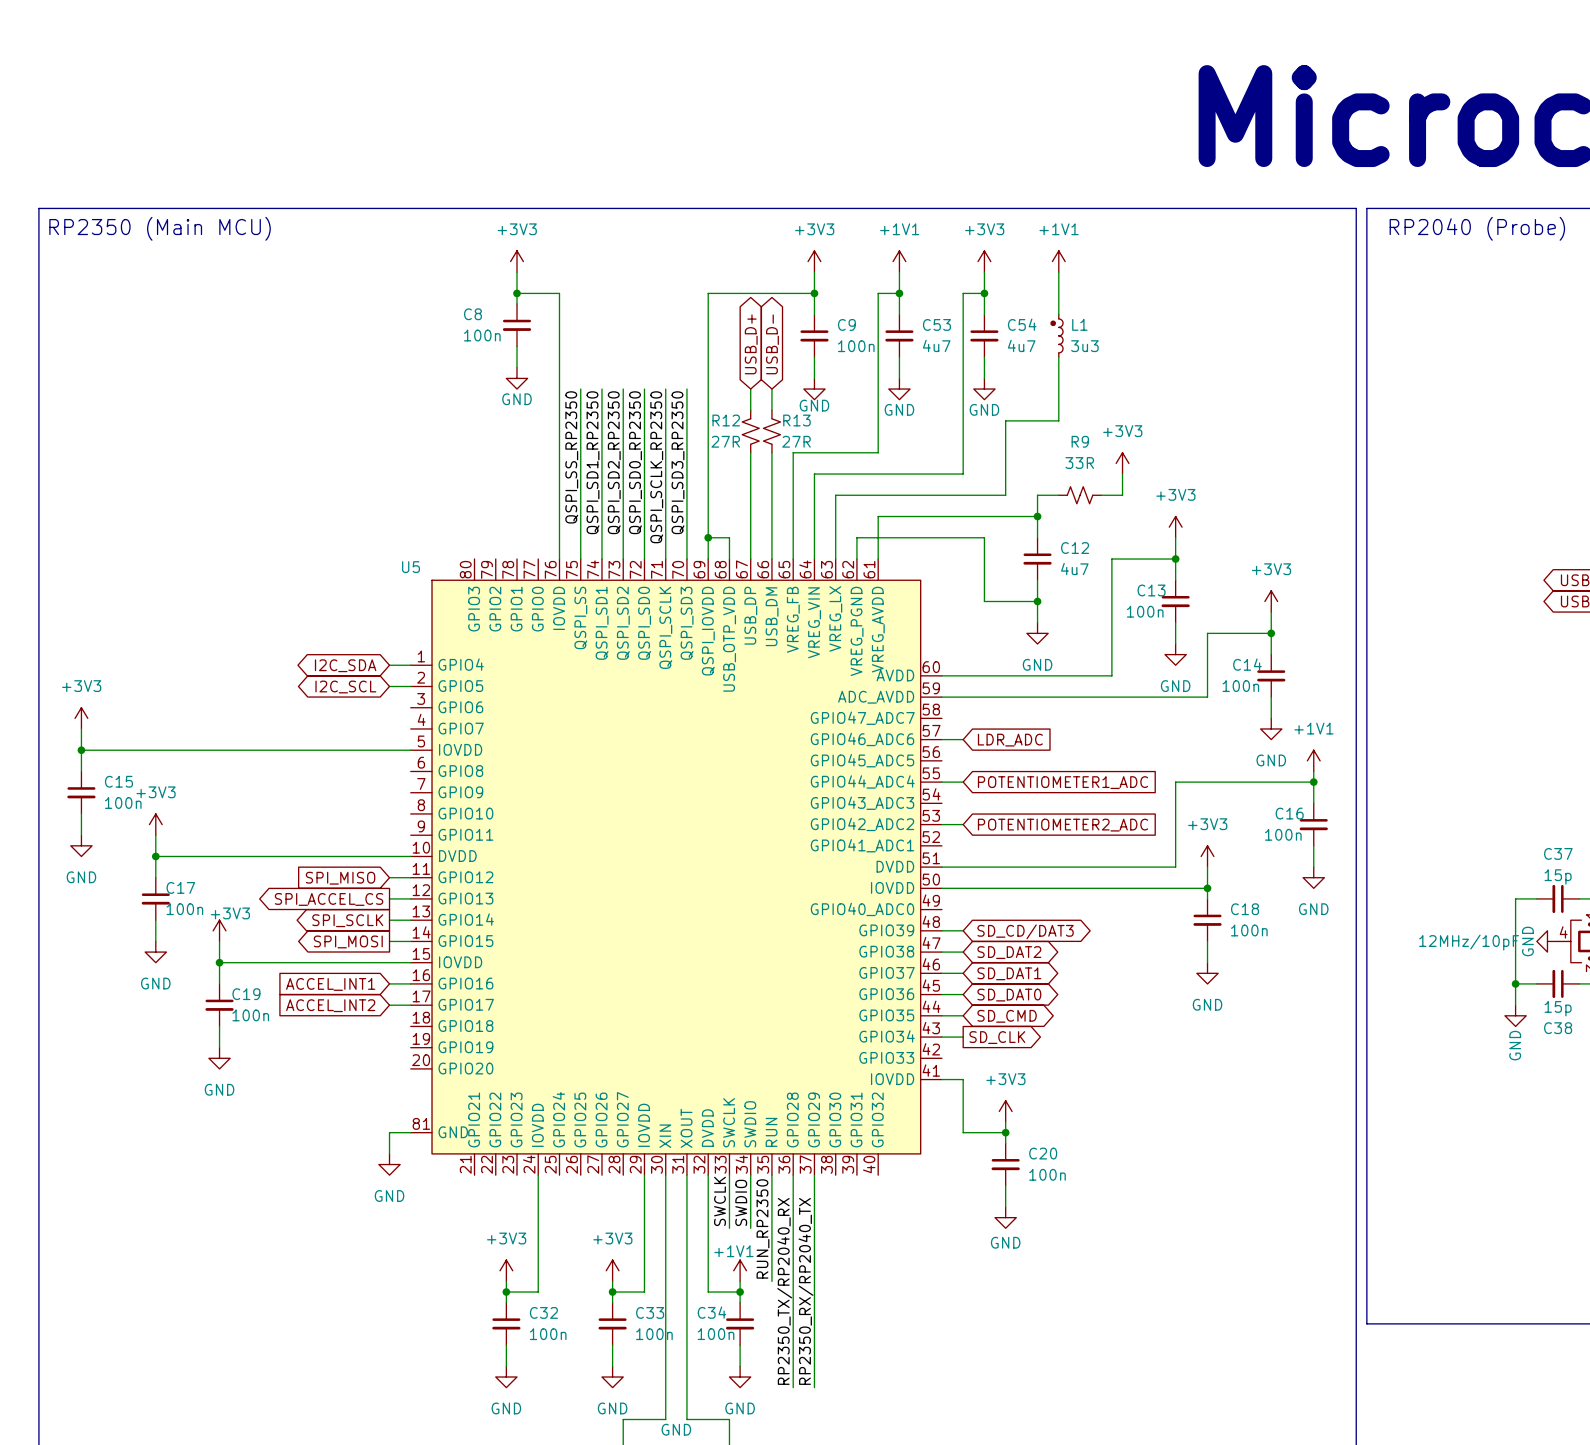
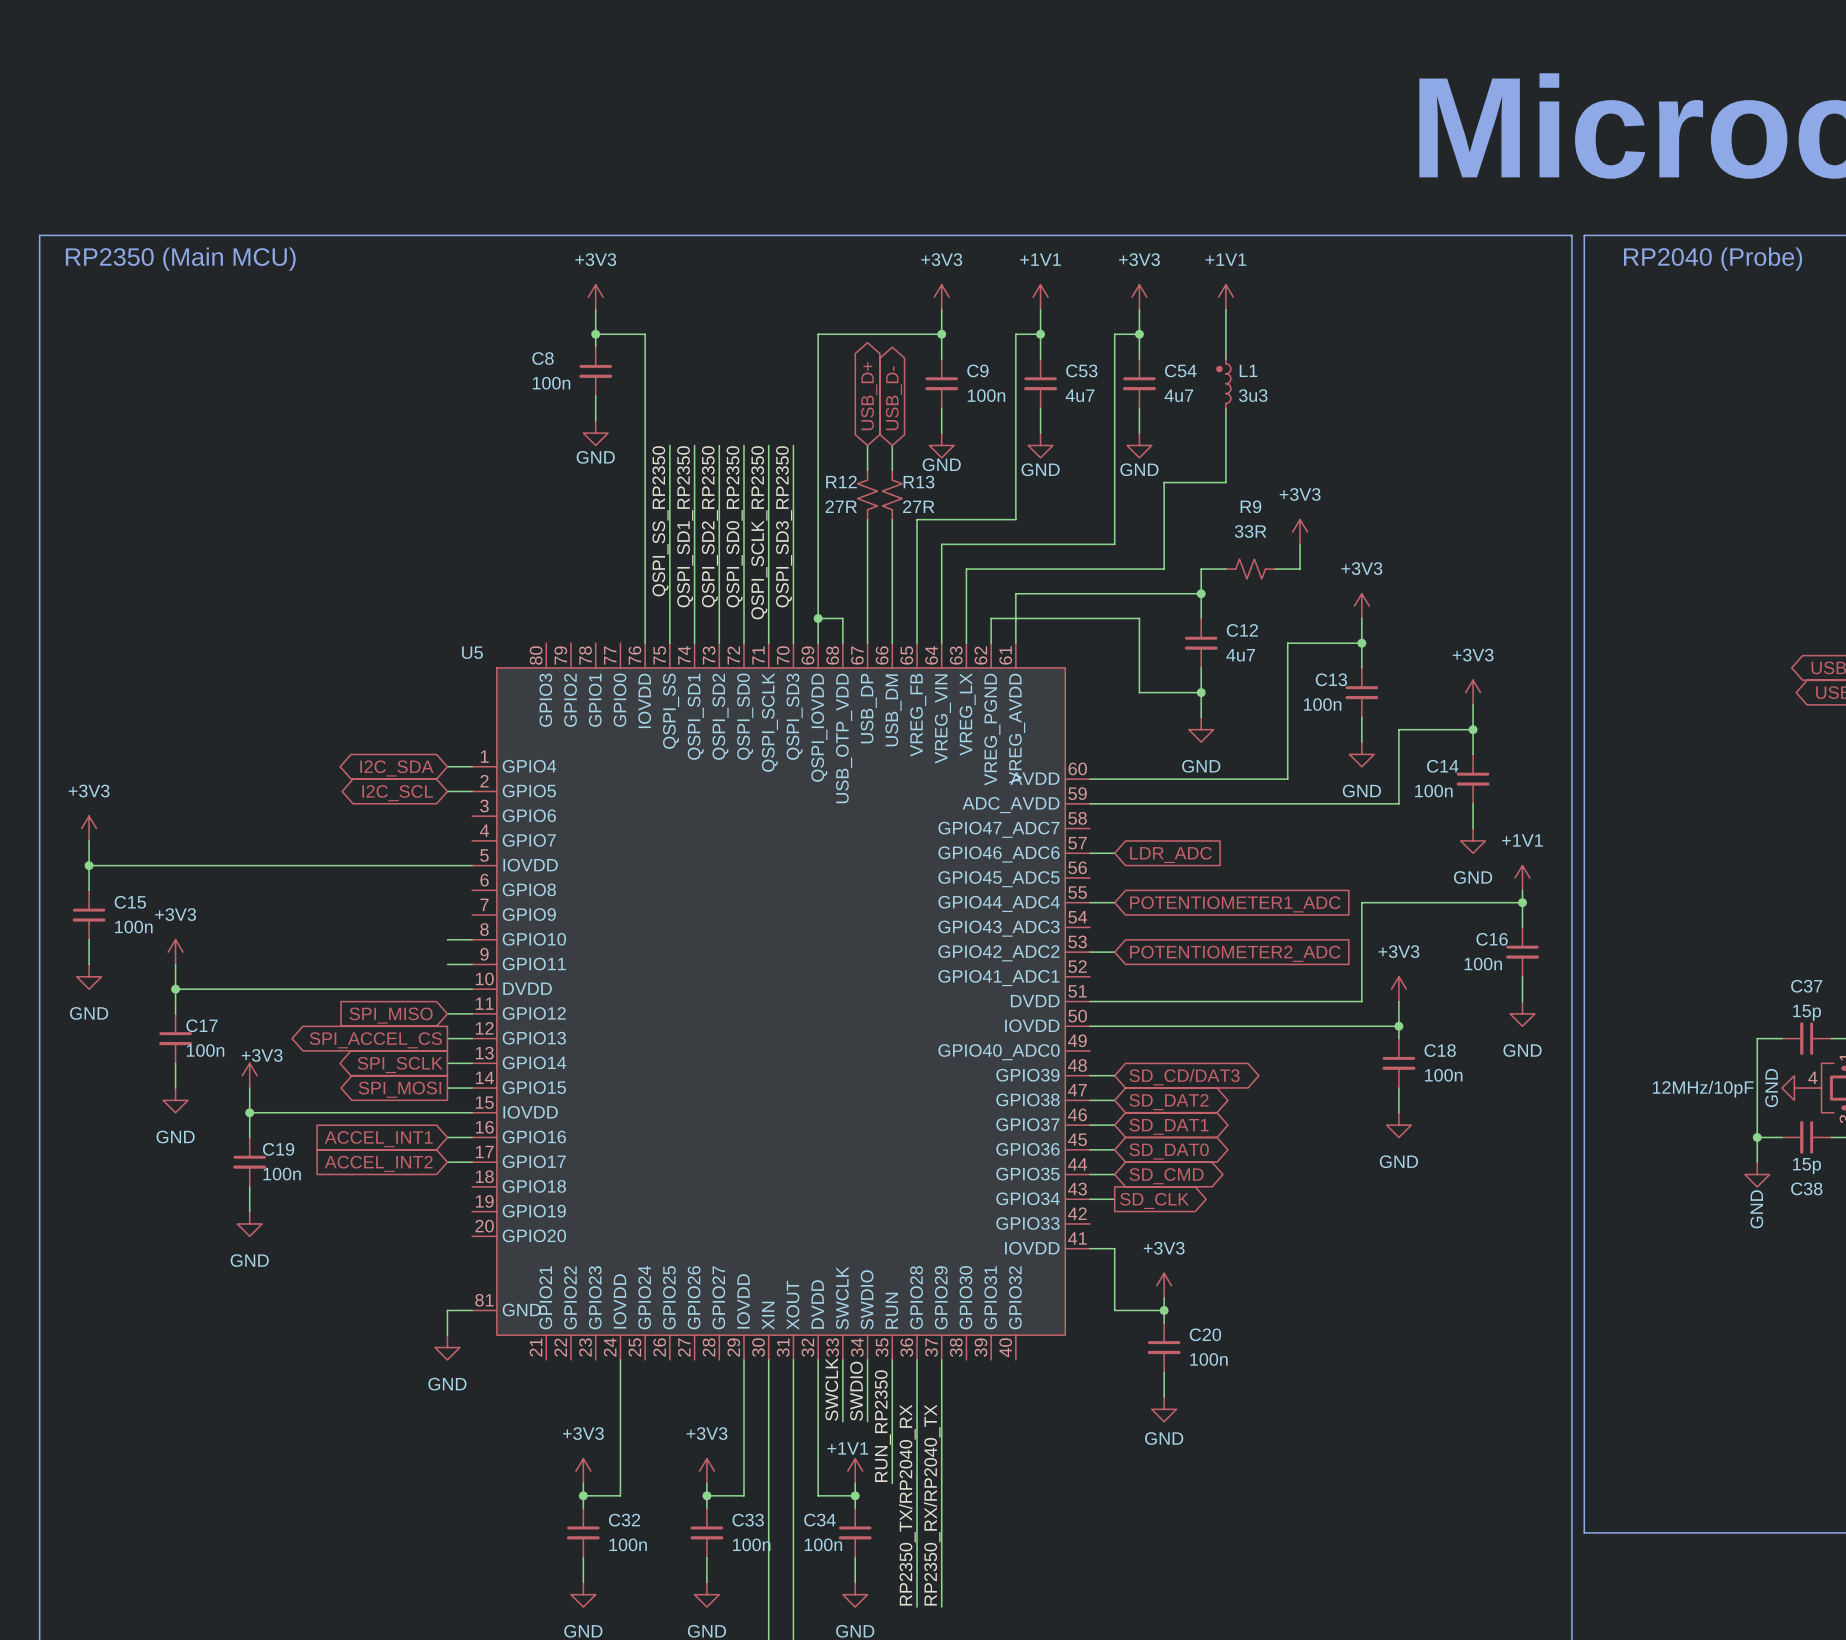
wire: none -> (447, 939) (472, 939)
wire: none -> (447, 964) (472, 964)

